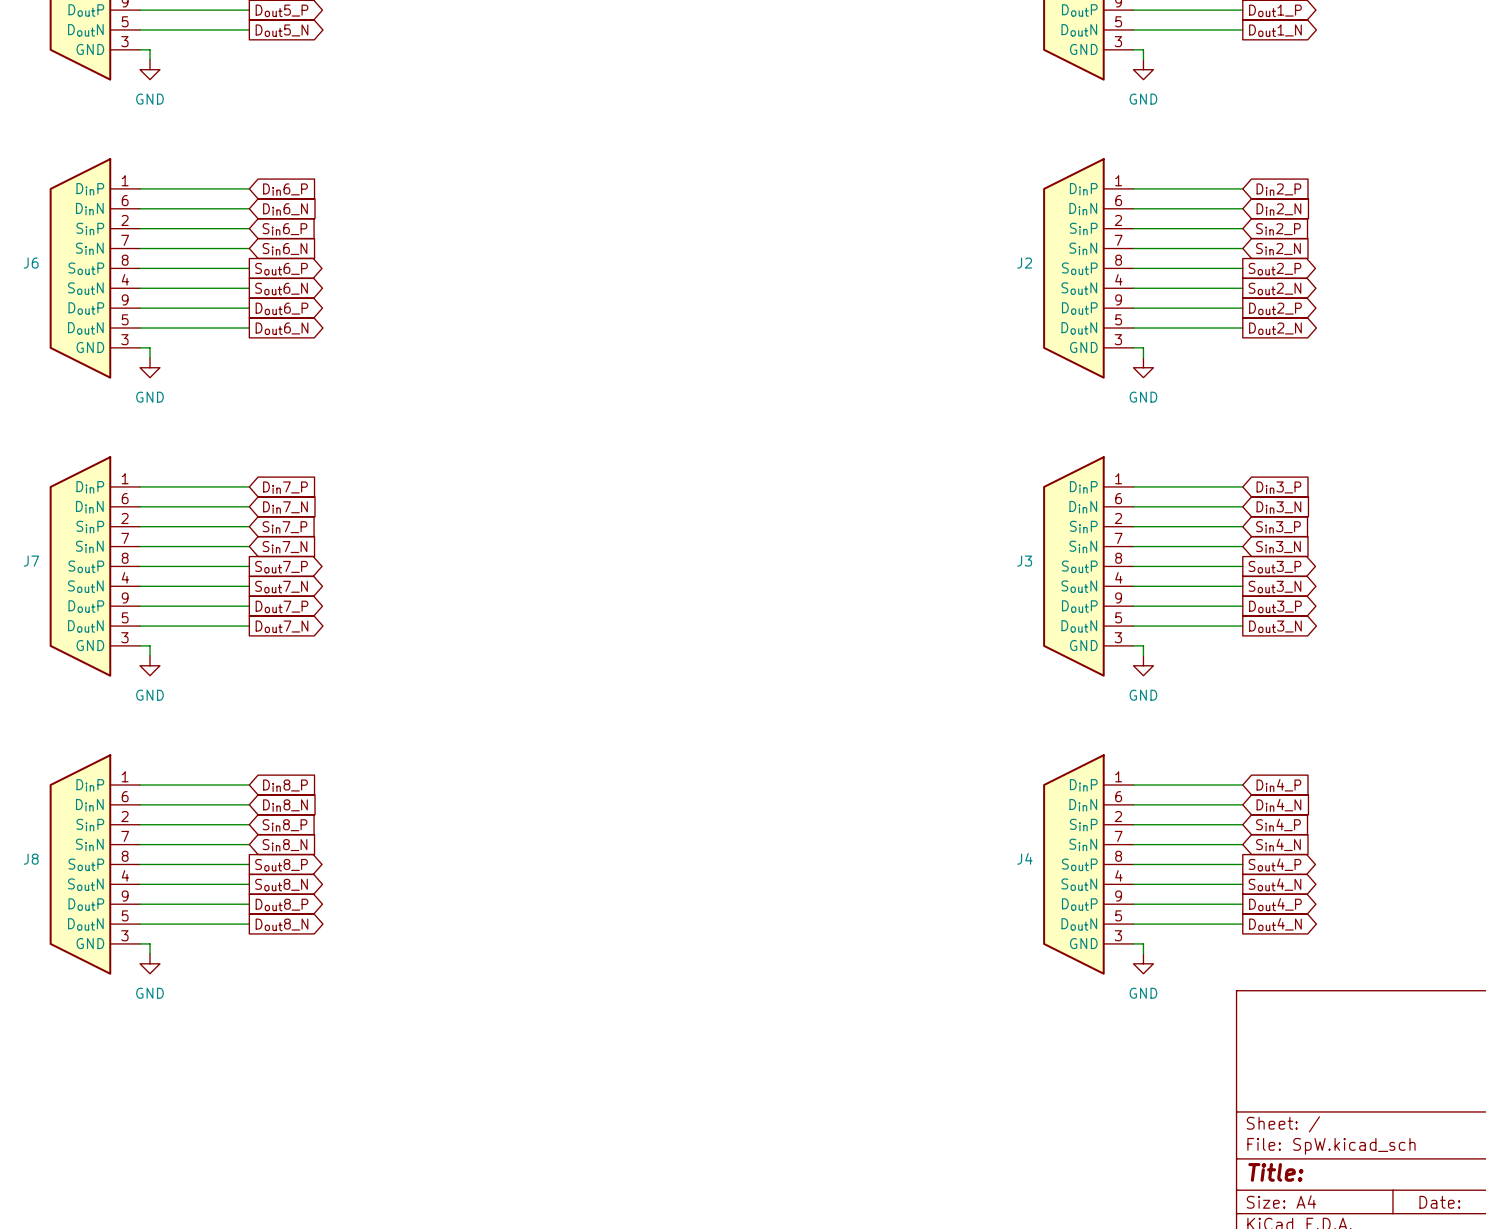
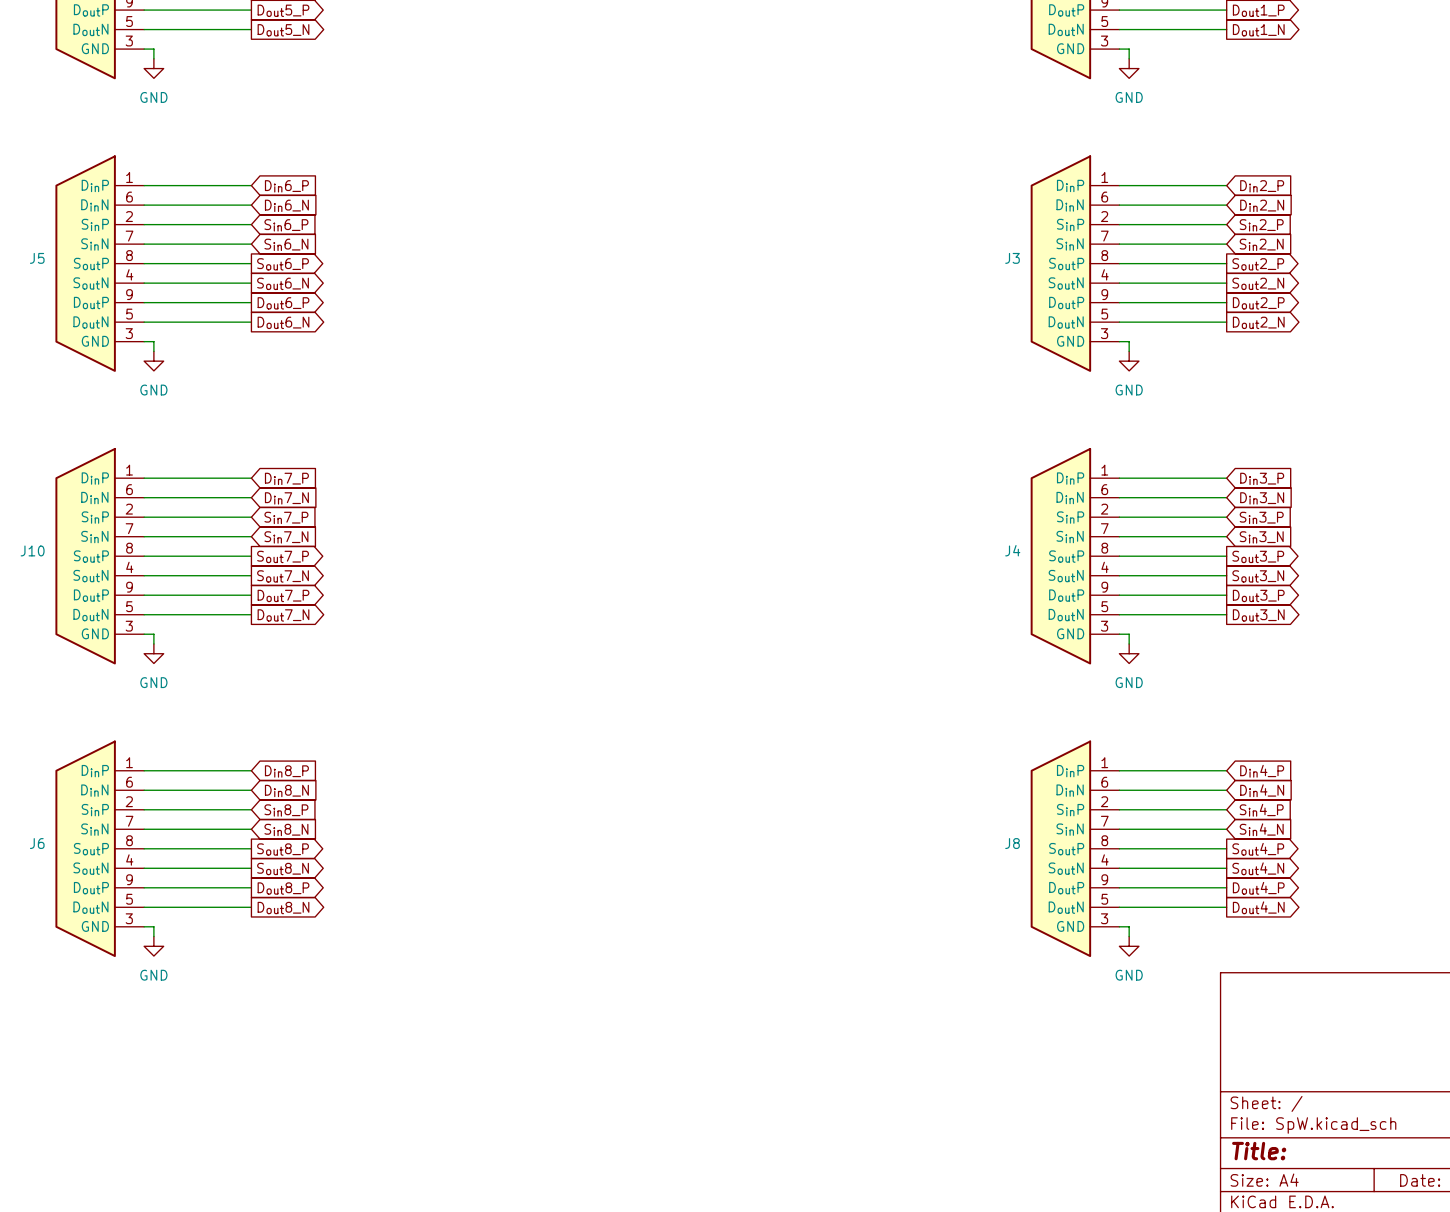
J6 name: J6 (31, 263) -> J5 (37, 258)
J2 name: J2 (1024, 263) -> J3 (1012, 258)
J7 name: J7 (31, 561) -> J10 (32, 550)
J3 name: J3 (1024, 561) -> J4 (1012, 550)
J4 name: J4 (1024, 858) -> J8 (1012, 843)
J8 name: J8 (31, 859) -> J6 (37, 843)

